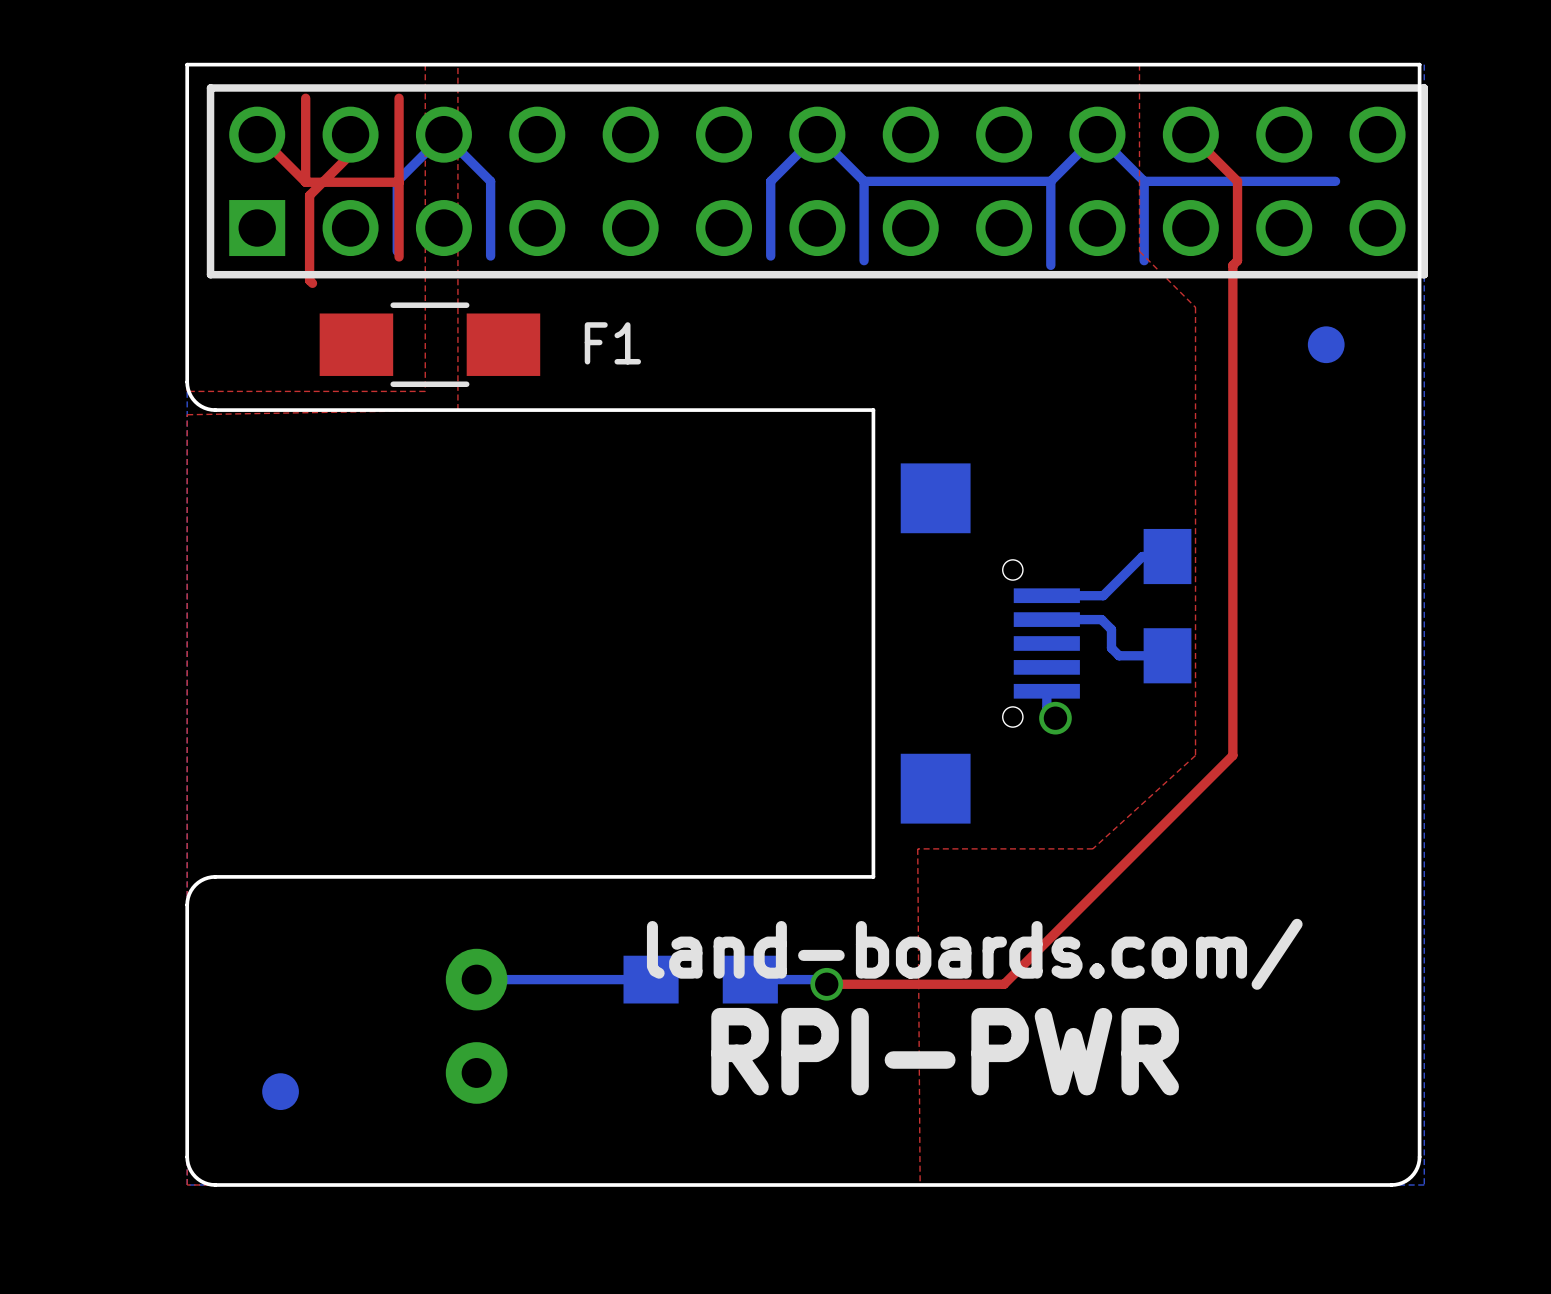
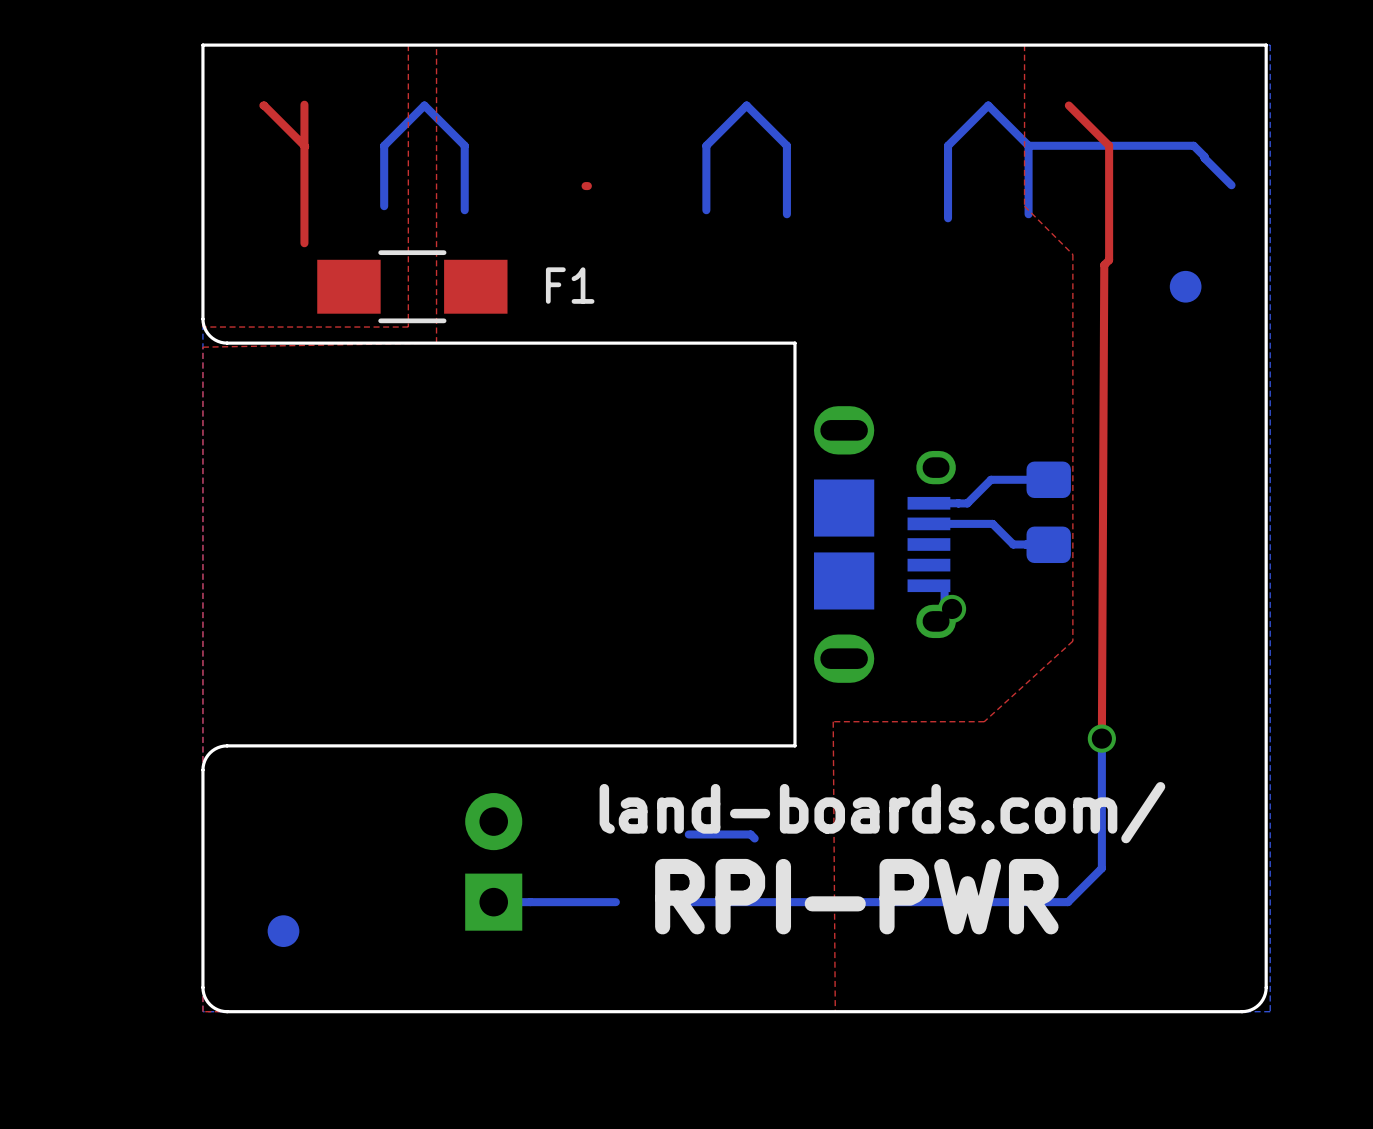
top track: (305, 98) (305, 182) (399, 182) -> none
top track: (399, 98) (399, 256) -> none
top track: none -> (304, 104) (304, 243)
top track: (350, 134) (350, 154) (309, 195) (309, 280) (312, 283) -> none
part: (817, 181) -> none
bottom track: (864, 181) (1050, 181) -> none
bottom track: none -> (1193, 145) (1231, 185)
top track: (1237, 260) (1232, 265) (1232, 755) (1004, 984) (826, 984) -> (1109, 214) (1109, 260) (1104, 265) (1101, 738)
part footprint: [900, 463, 1080, 824] -> [813, 406, 956, 683]
part footprint: [1143, 528, 1192, 684] -> [1026, 461, 1071, 564]
bottom track: (1167, 556) (1142, 556) (1103, 595) (1073, 595) -> (1048, 479) (991, 479) (967, 503)
bottom track: (1101, 619) (1111, 629) (1111, 648) (1119, 655) (1167, 655) -> (991, 523) (1013, 544) (1026, 544)
bottom track: none -> (1101, 738) (1101, 868) (1068, 902) (680, 902)
via: none -> (1101, 738)
bottom track: (476, 979) (651, 979) -> none
part: (700, 979) -> none
via: (826, 984) -> none
part: none -> (493, 861)
part: (476, 1026) -> none
bottom track: none -> (493, 902) (615, 902)

